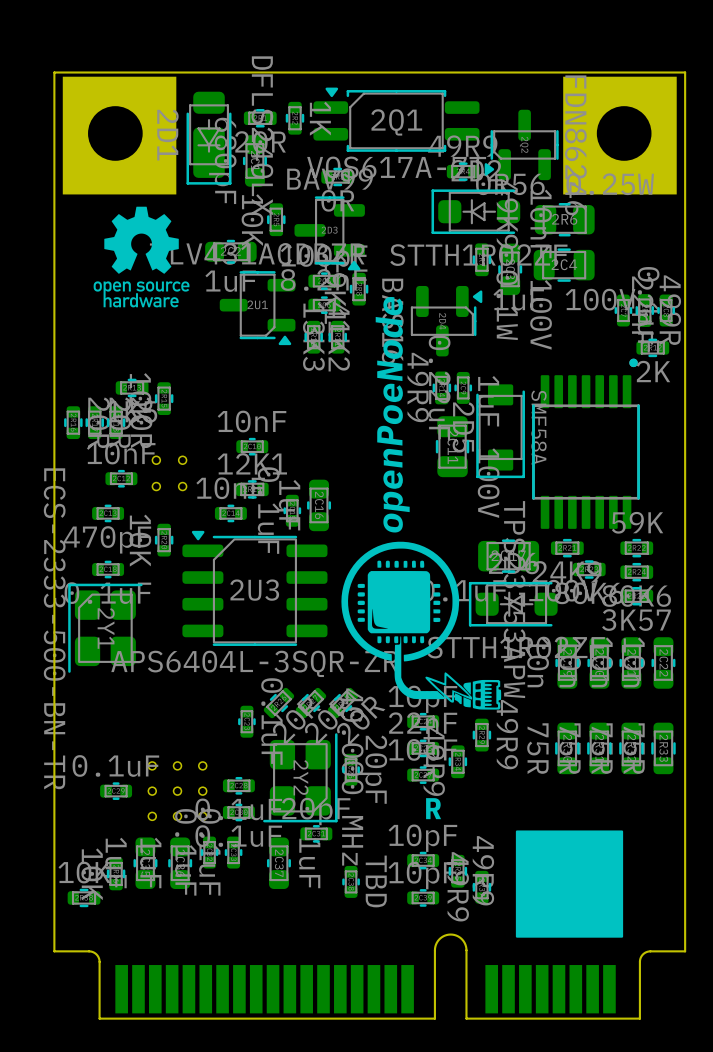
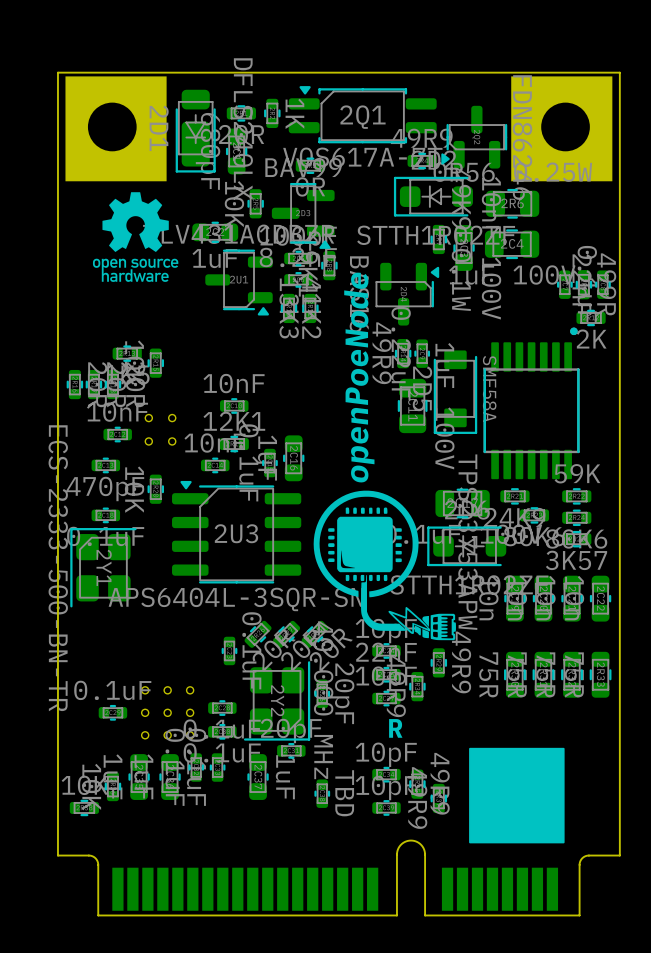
2U3 value: APS6404L-3SQR-ZR (254, 663) -> APS6404L-3SQR-SN (235, 599)

